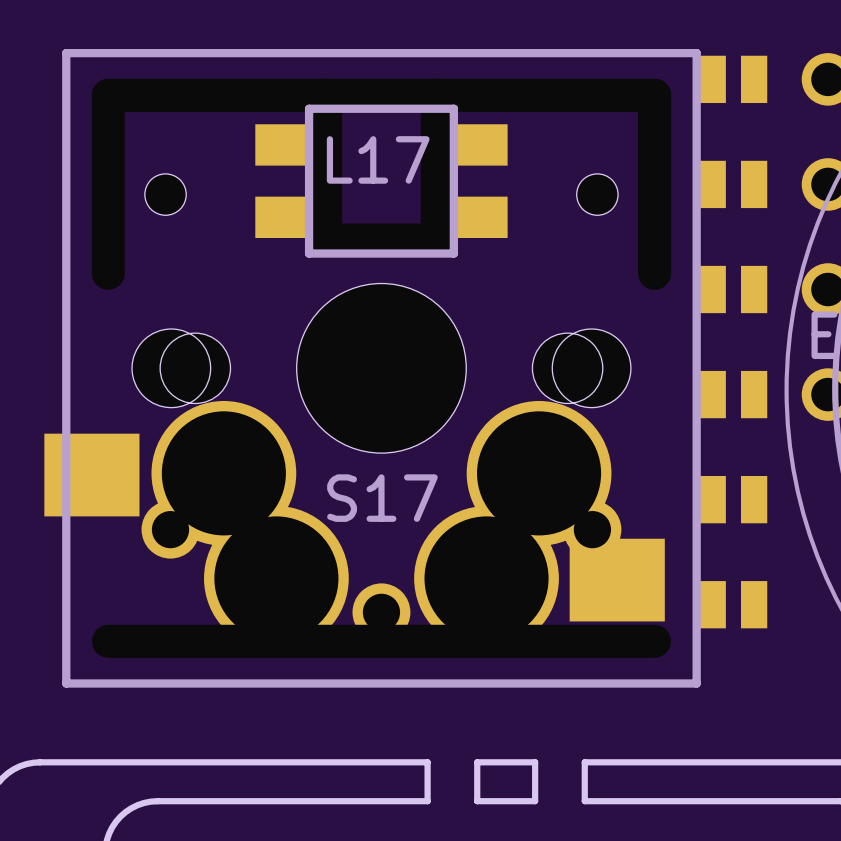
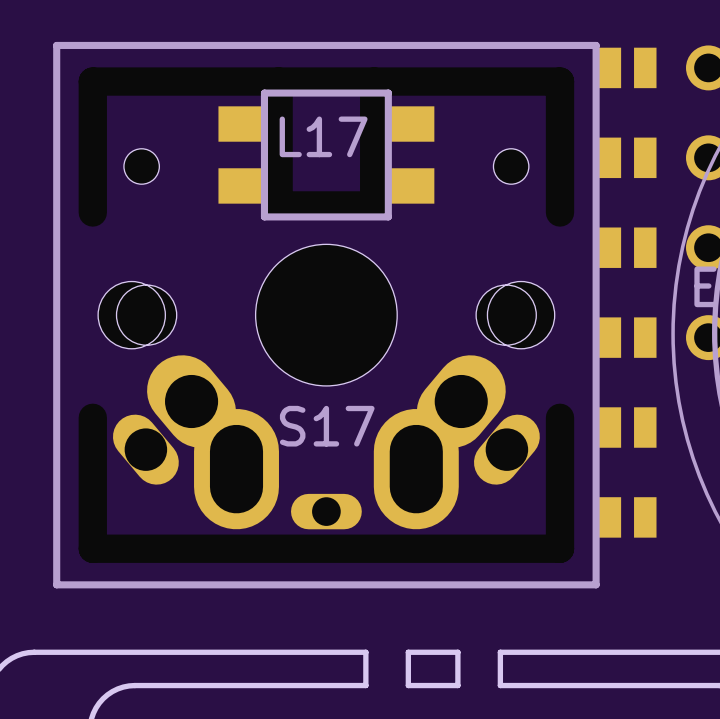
S17 footprint: [44, 48, 701, 688] -> [53, 41, 600, 589]

